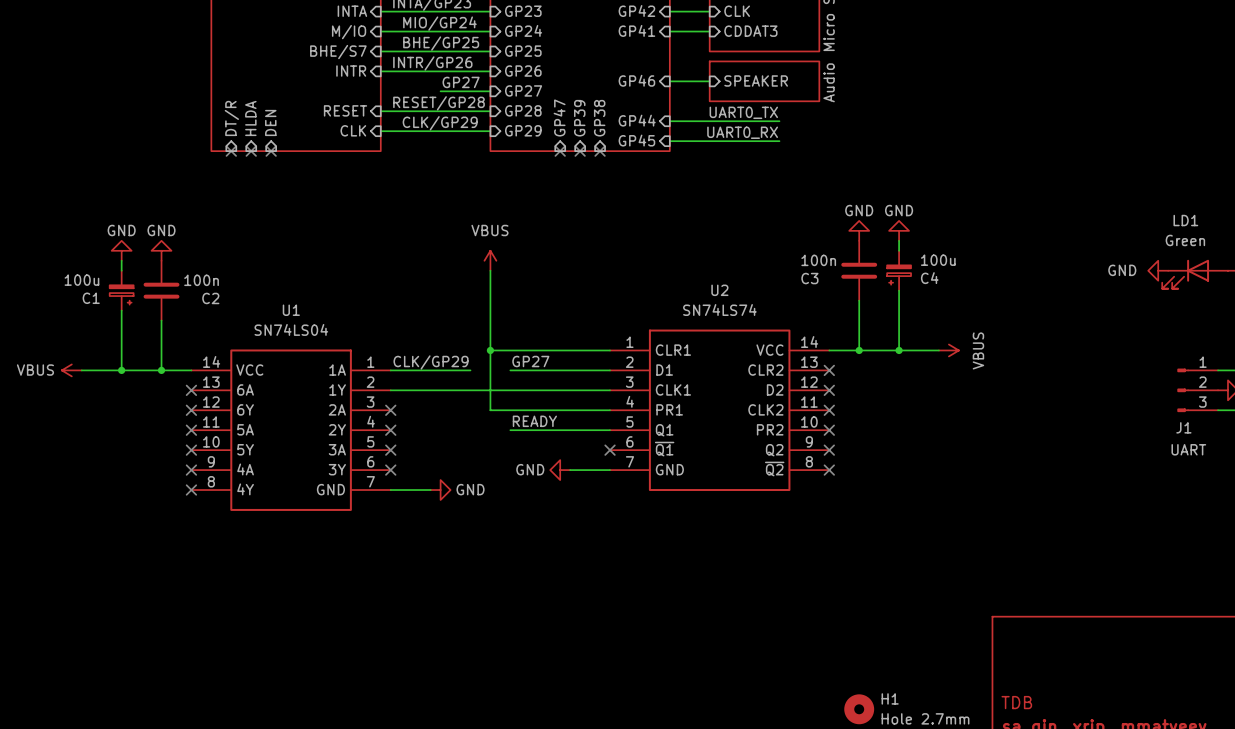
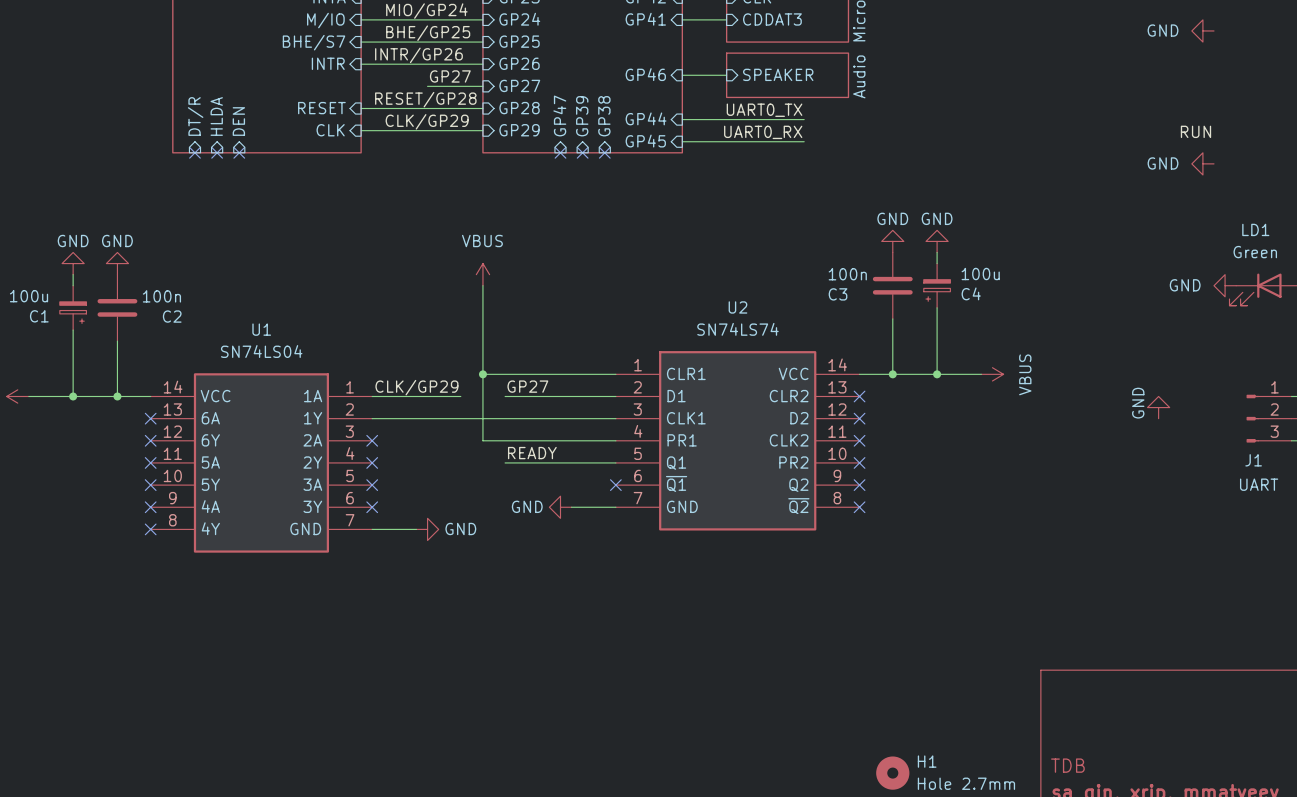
power symbol: none -> GND (1202, 30)
label: none -> RUN (1195, 131)
power symbol: none -> GND (1202, 163)
power symbol: none -> GND (1158, 407)

